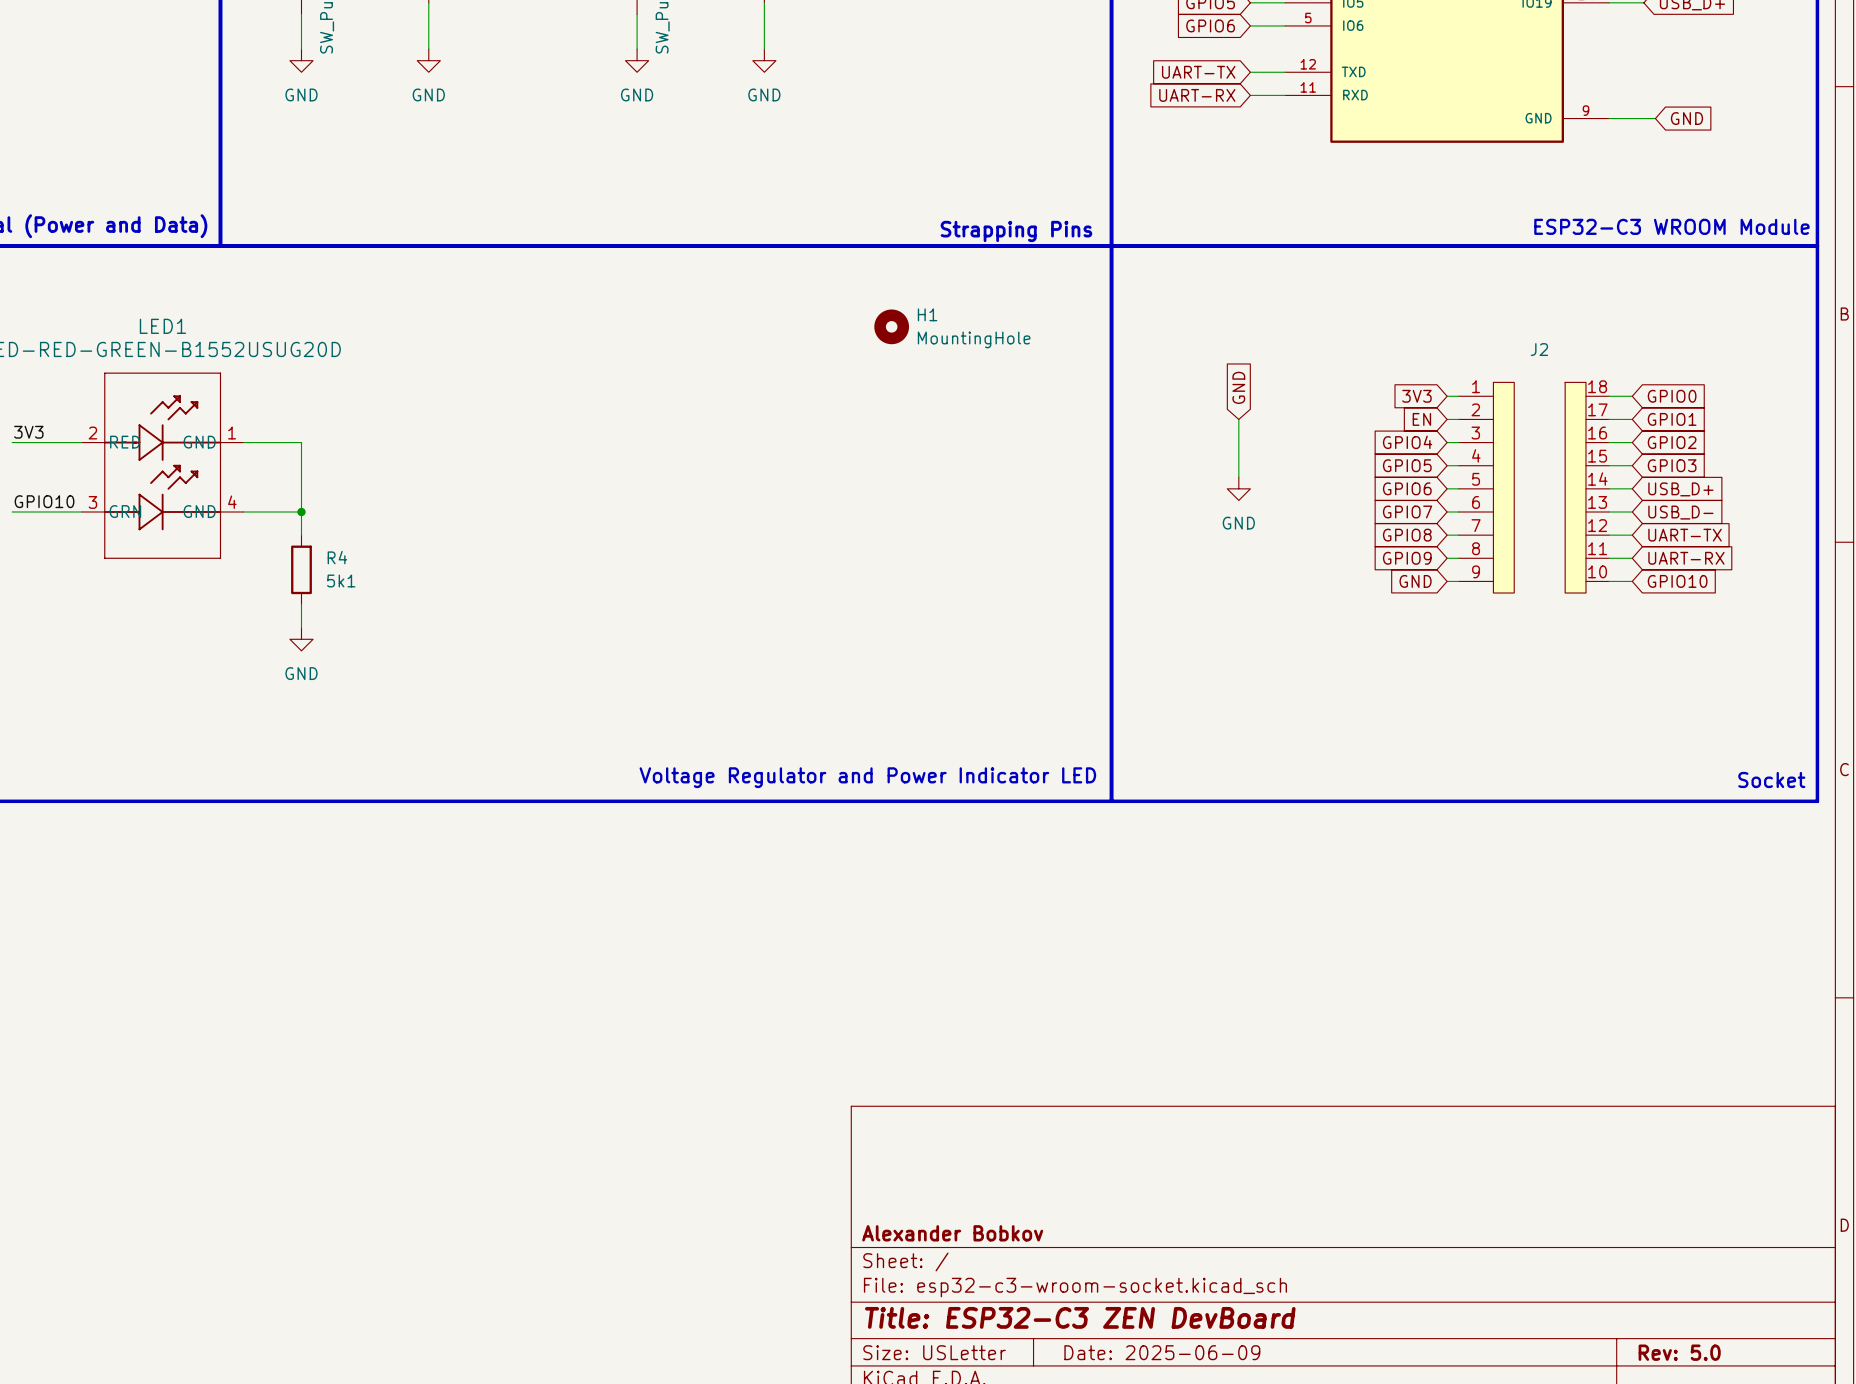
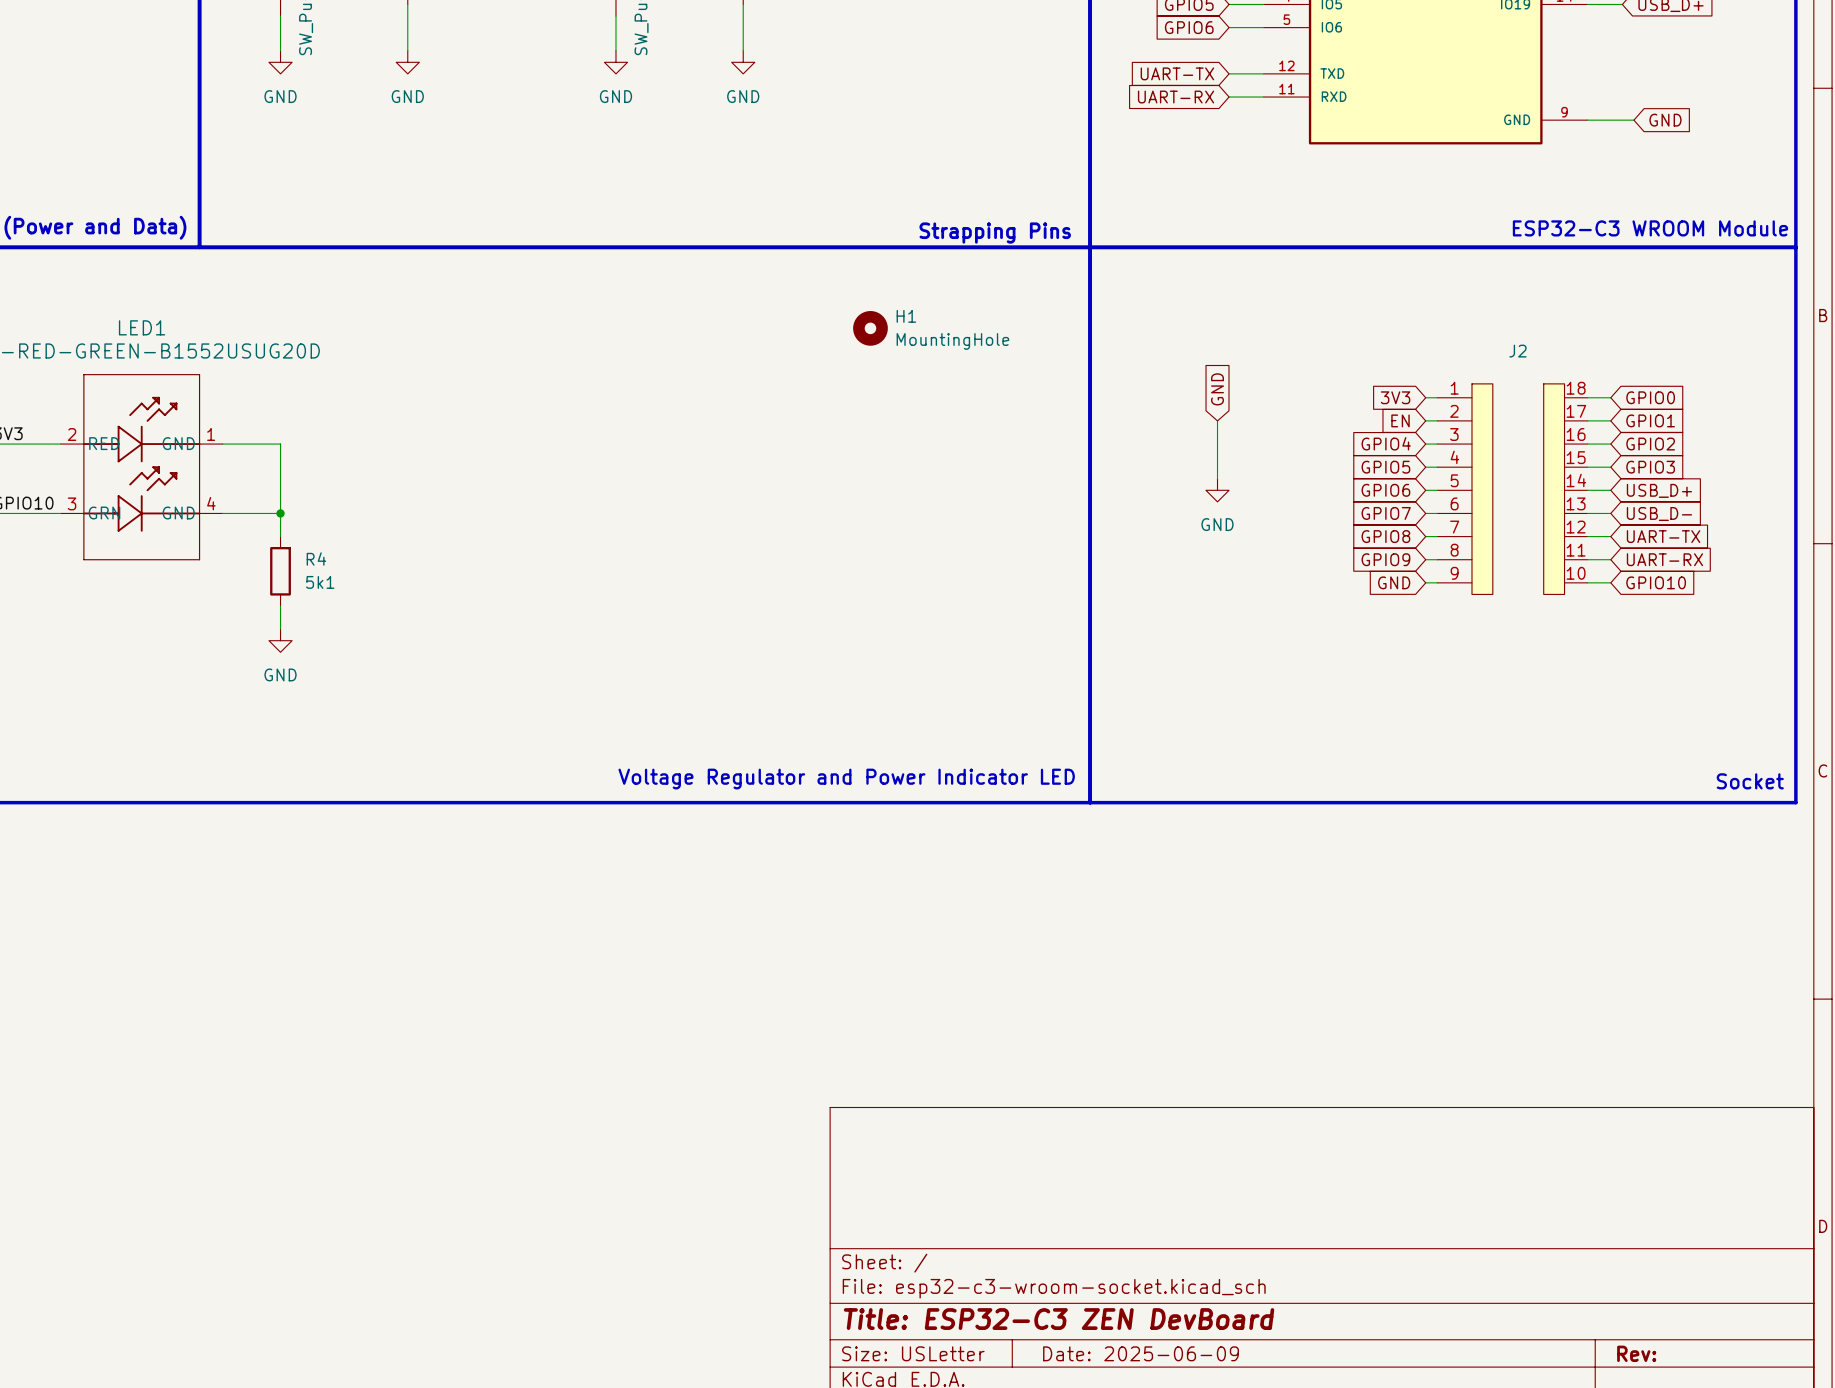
title block: Alexander Bobkov (952, 1233) -> none
title block: Rev: 5.0 (1679, 1352) -> Rev: (1636, 1353)

